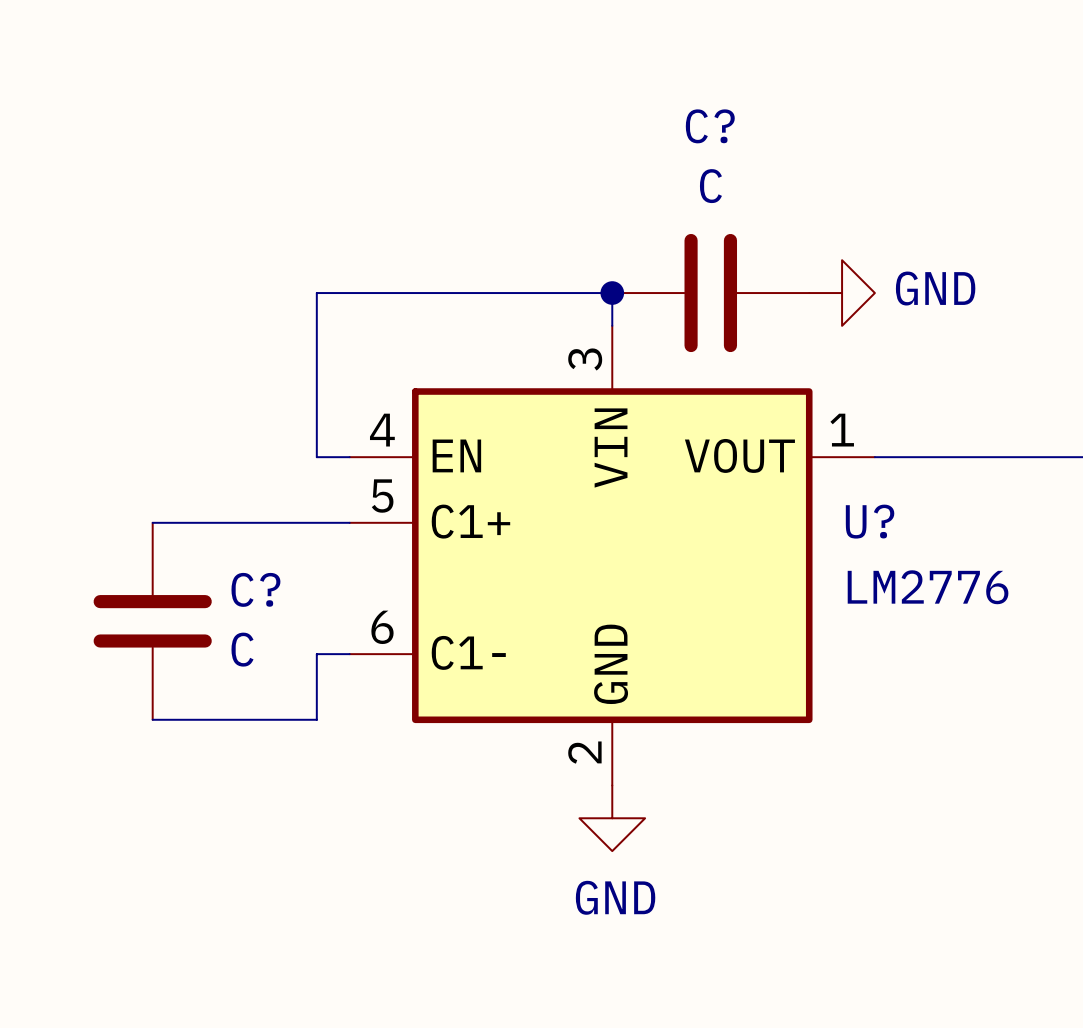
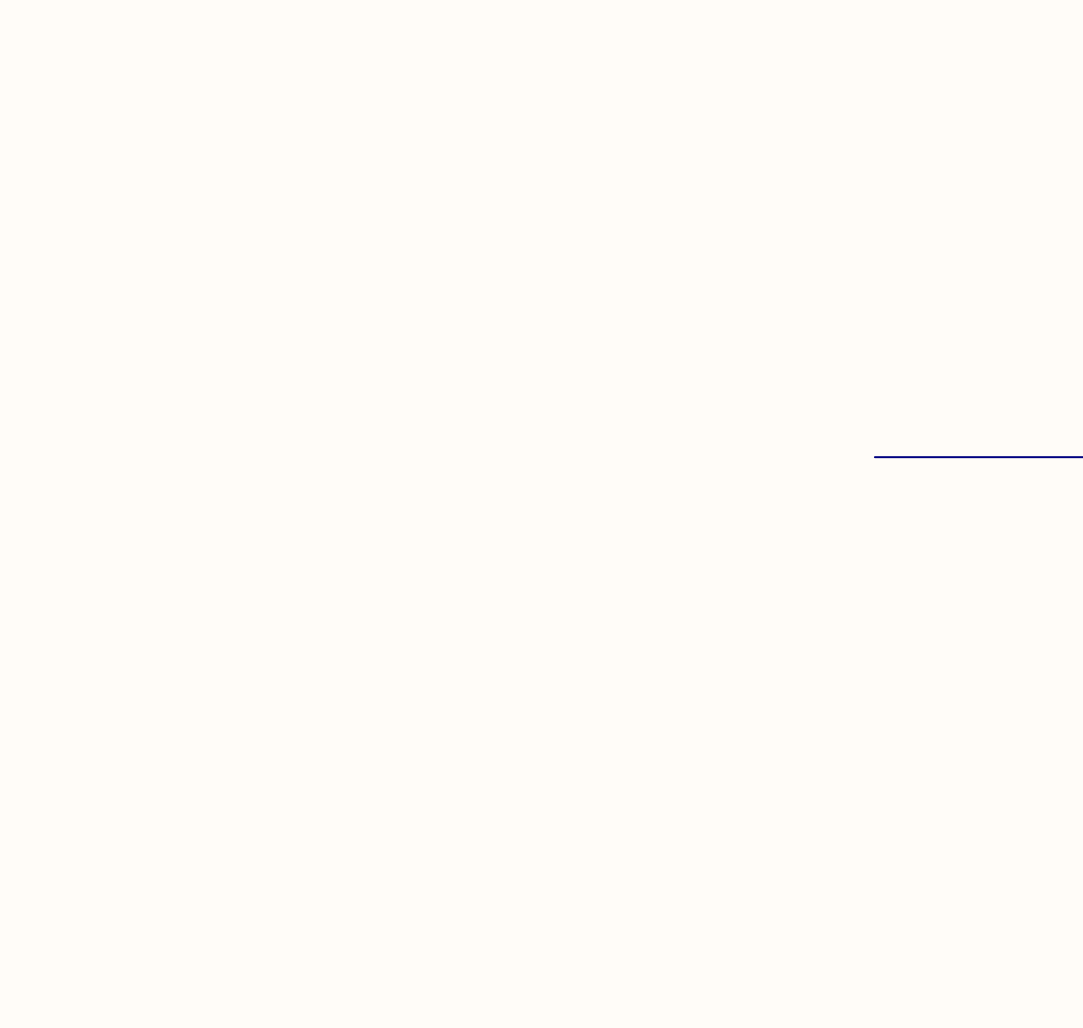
junction: (612, 293) -> none
C?: C (710, 293) -> none
power symbol: GND (842, 293) -> none
wire: (612, 325) (612, 293) (316, 293) (316, 457) (349, 457) -> none
wire: (152, 522) (349, 522) -> none
U?: LM2776 (612, 555) -> none
C?: C (152, 621) -> none
wire: (349, 654) (316, 654) (316, 719) (152, 719) -> none
power symbol: GND (612, 818) -> none

